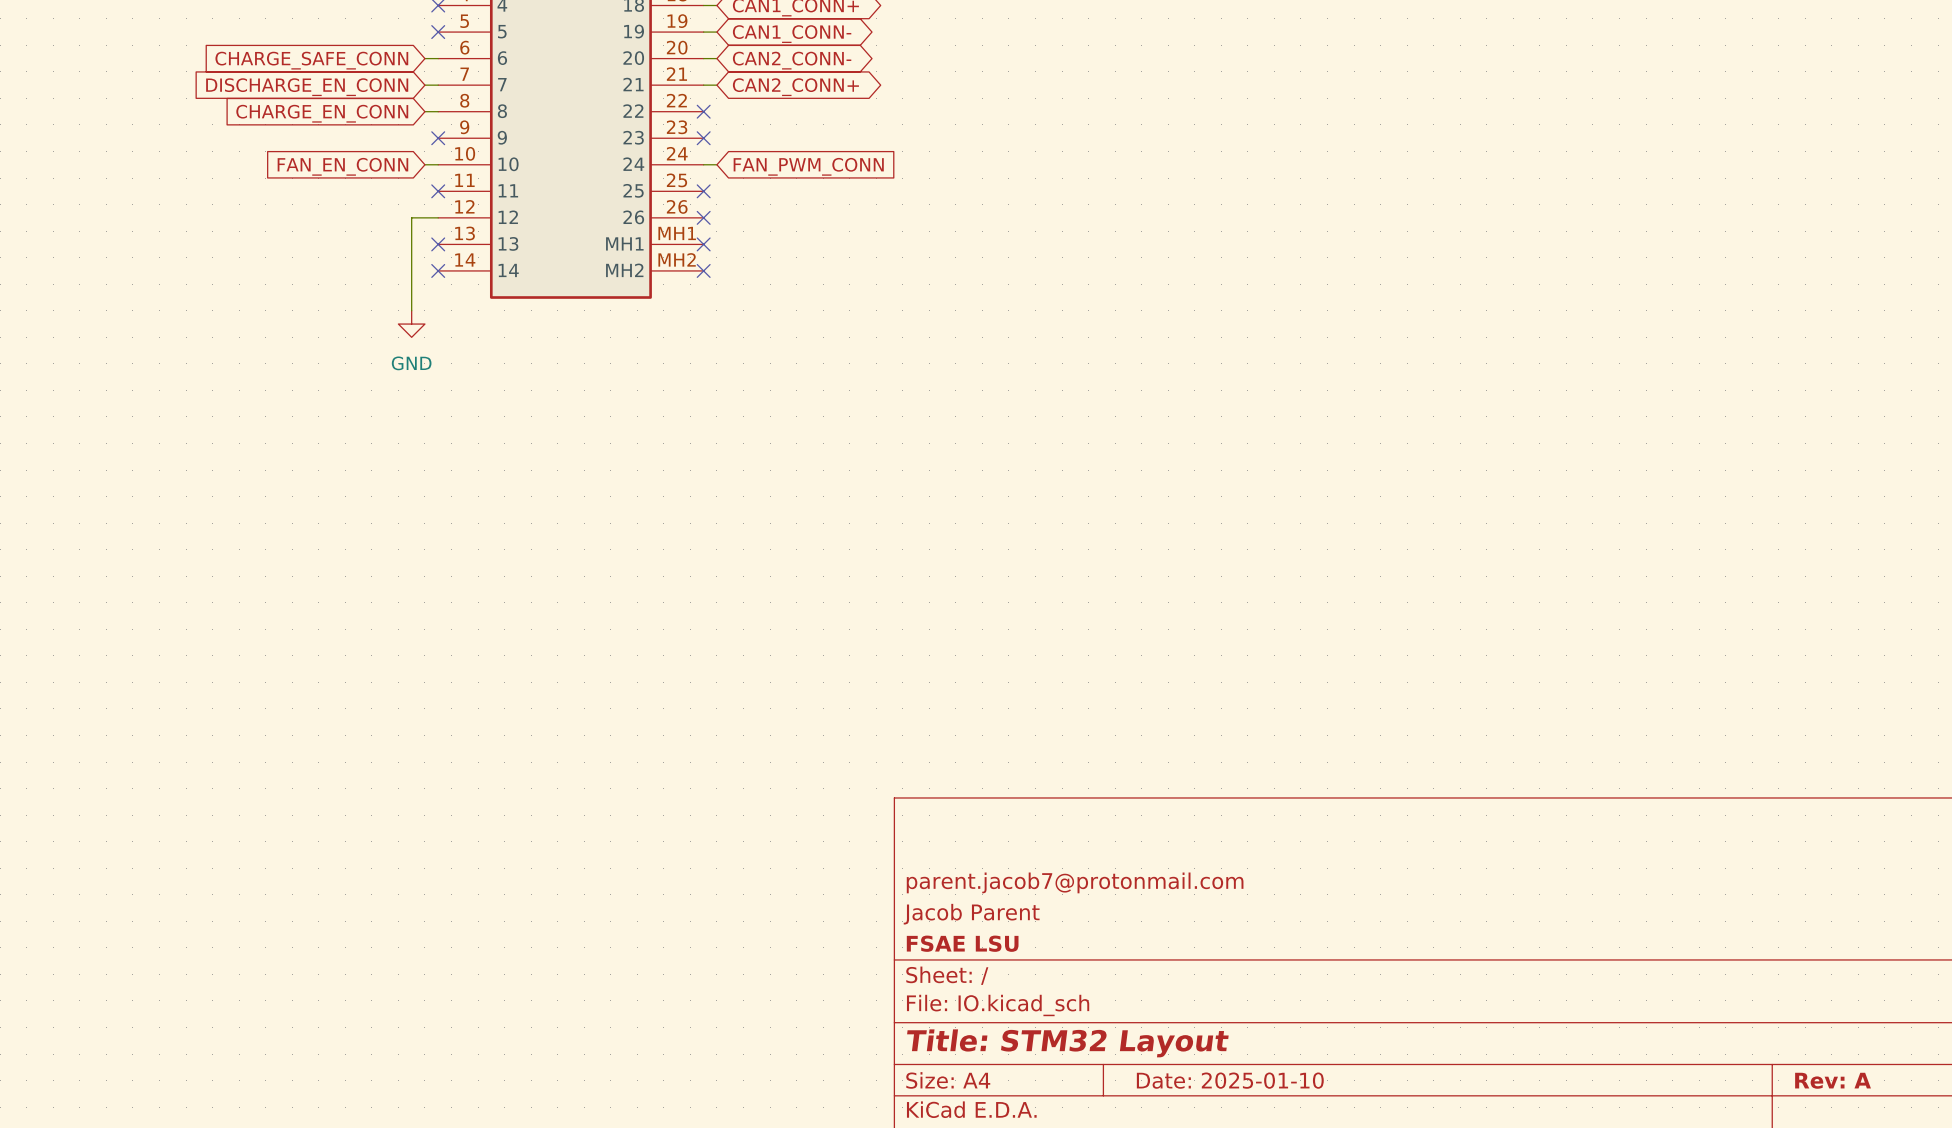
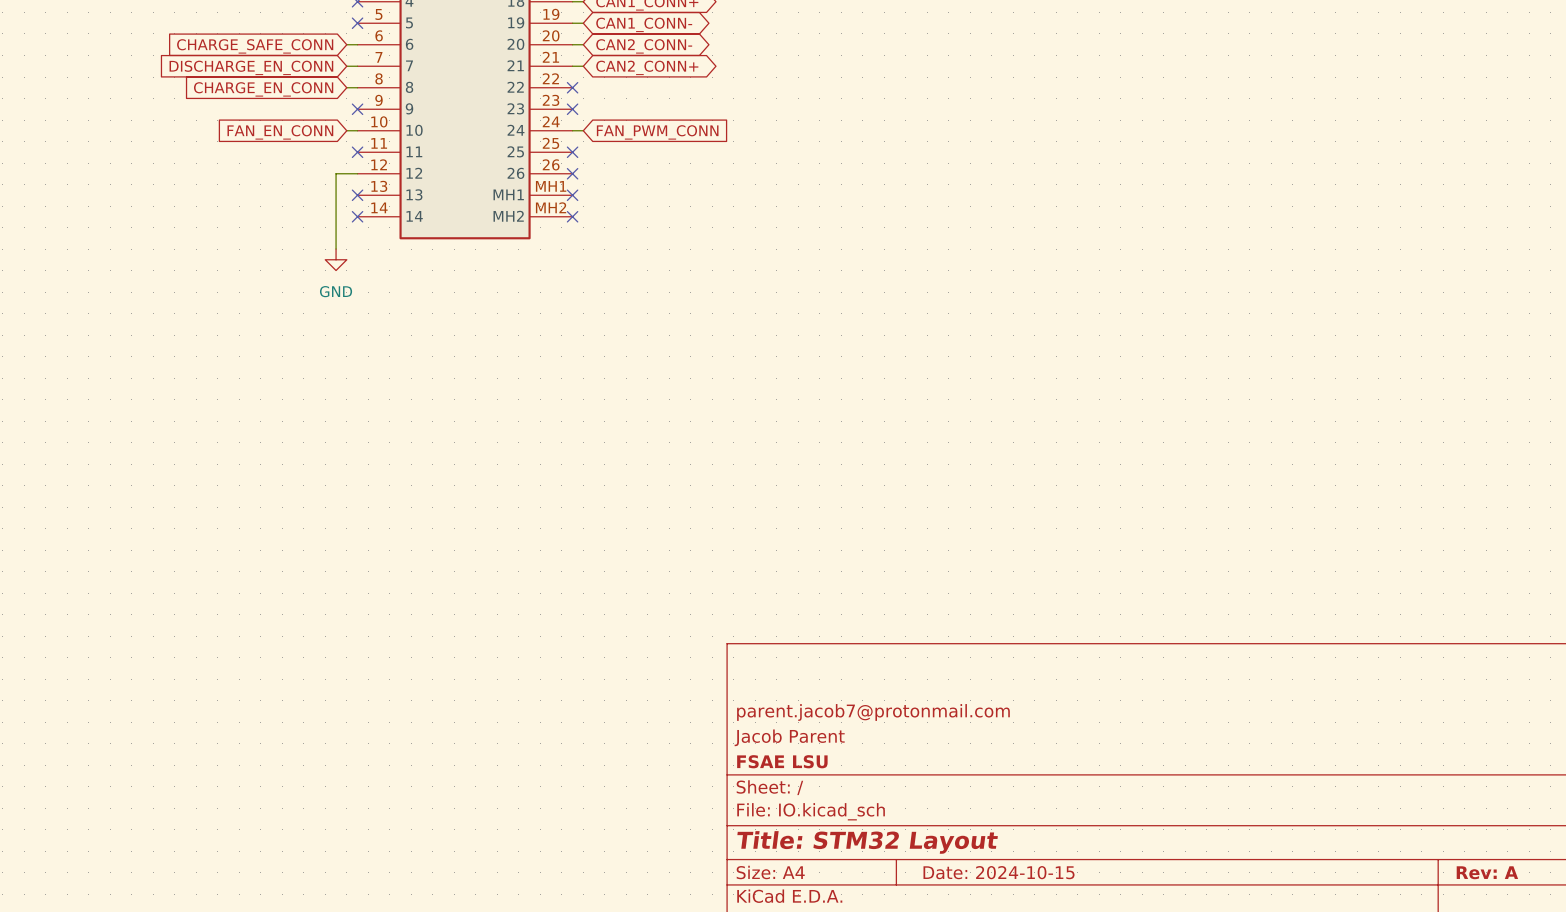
title block: Date: 2025-01-10 (1230, 1080) -> Date: 2024-10-15 (999, 872)

